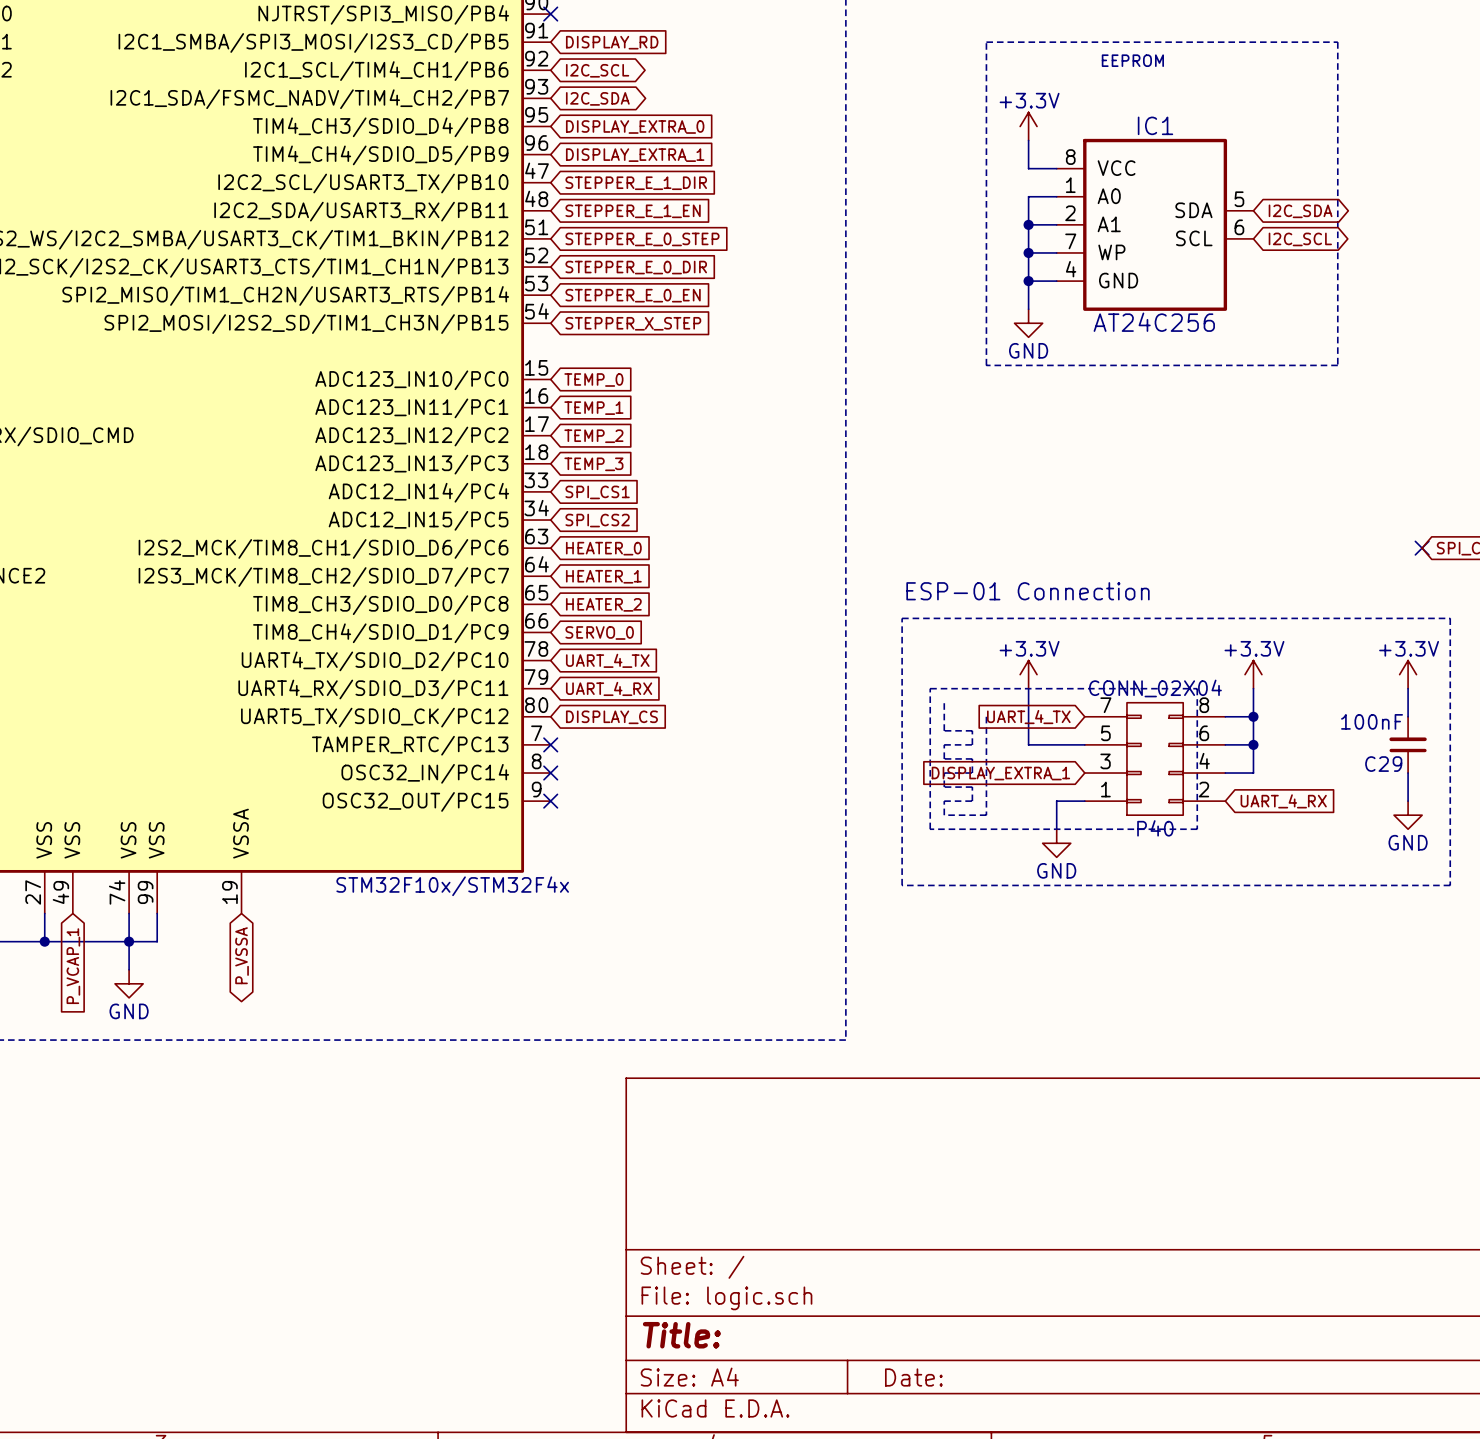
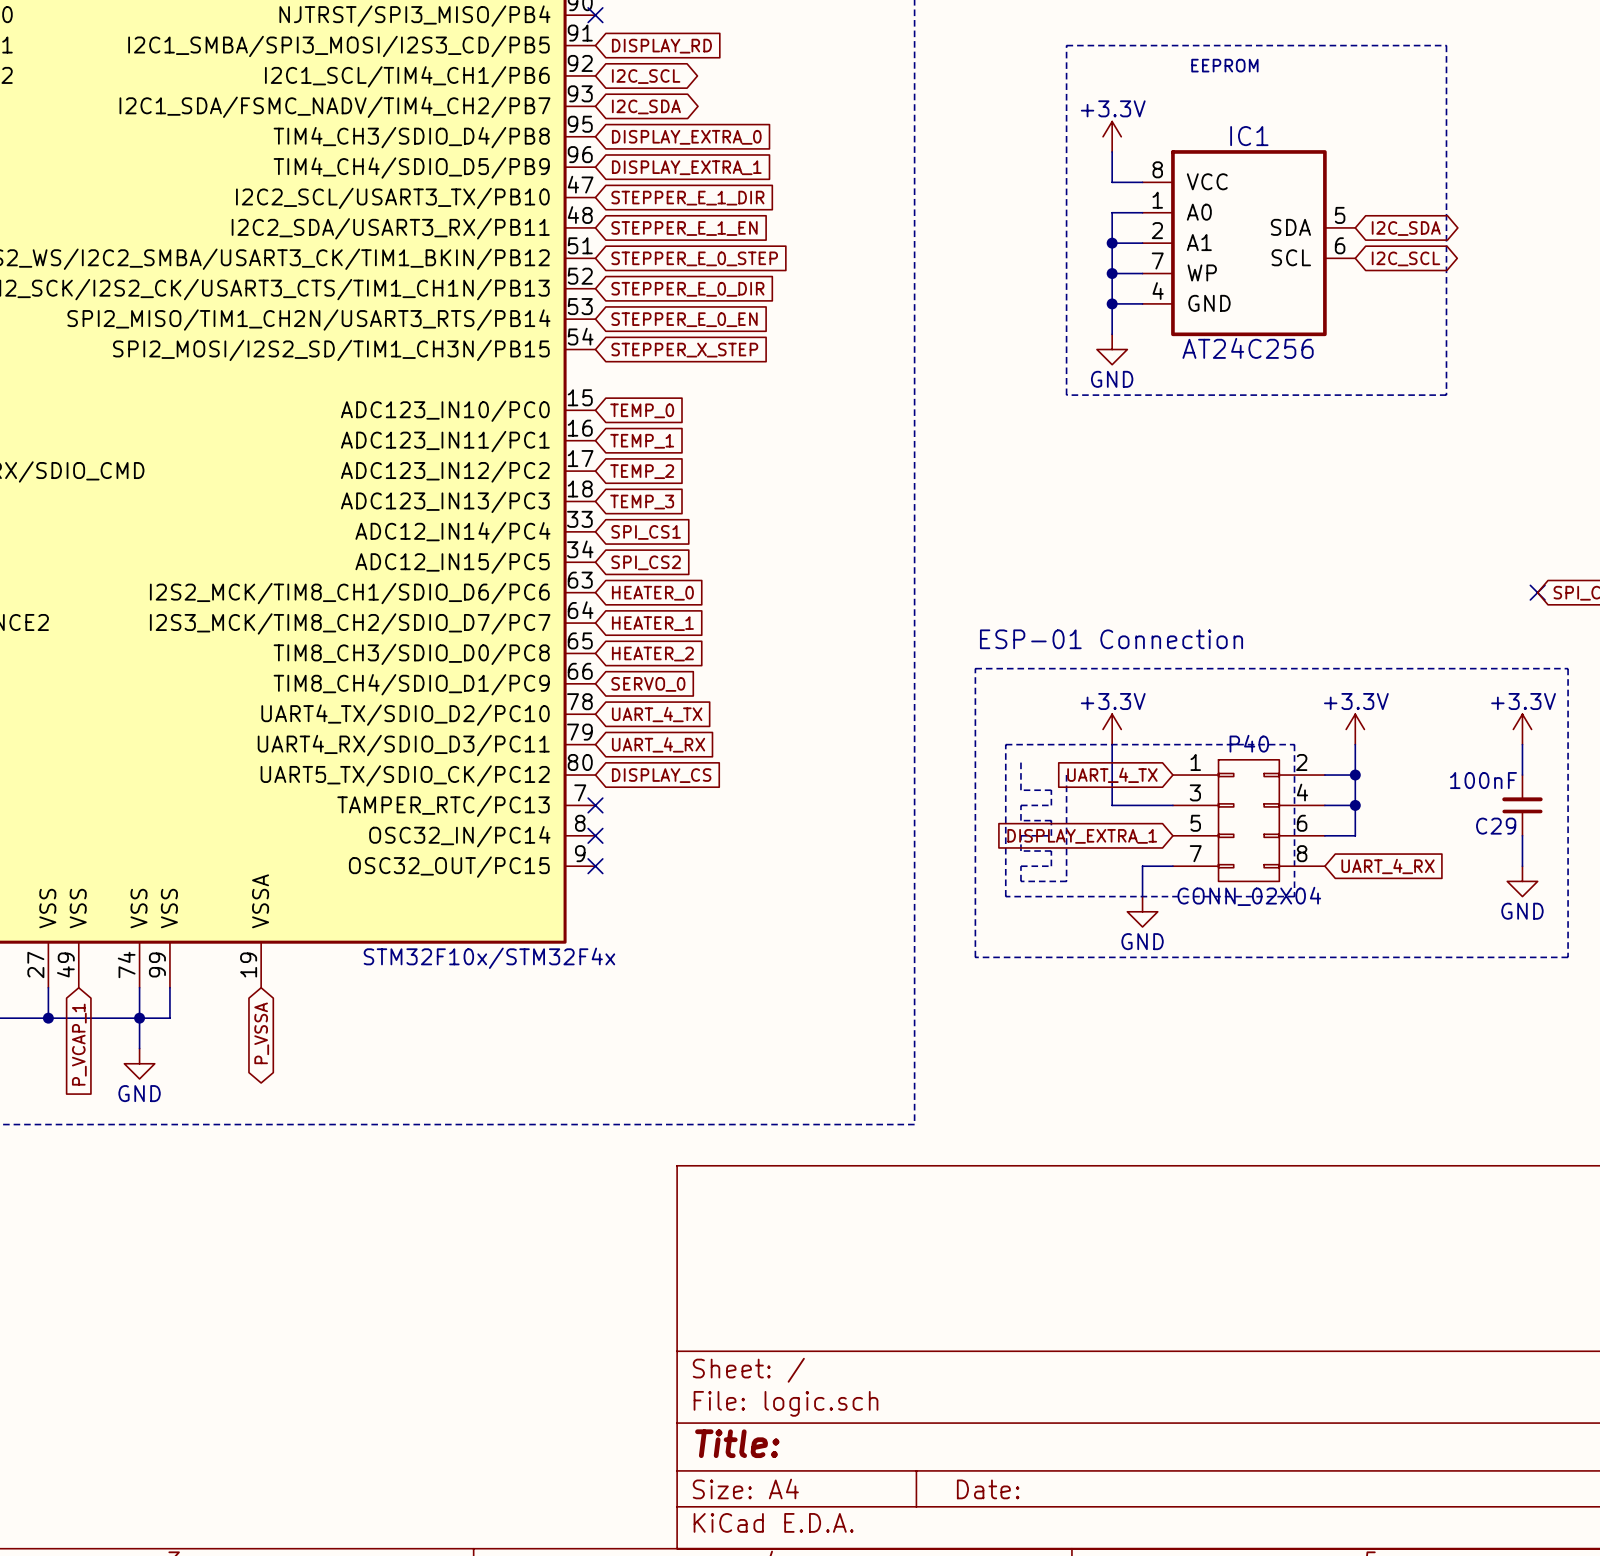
P40 flip: as is (1155, 758) -> up-down (1248, 820)

